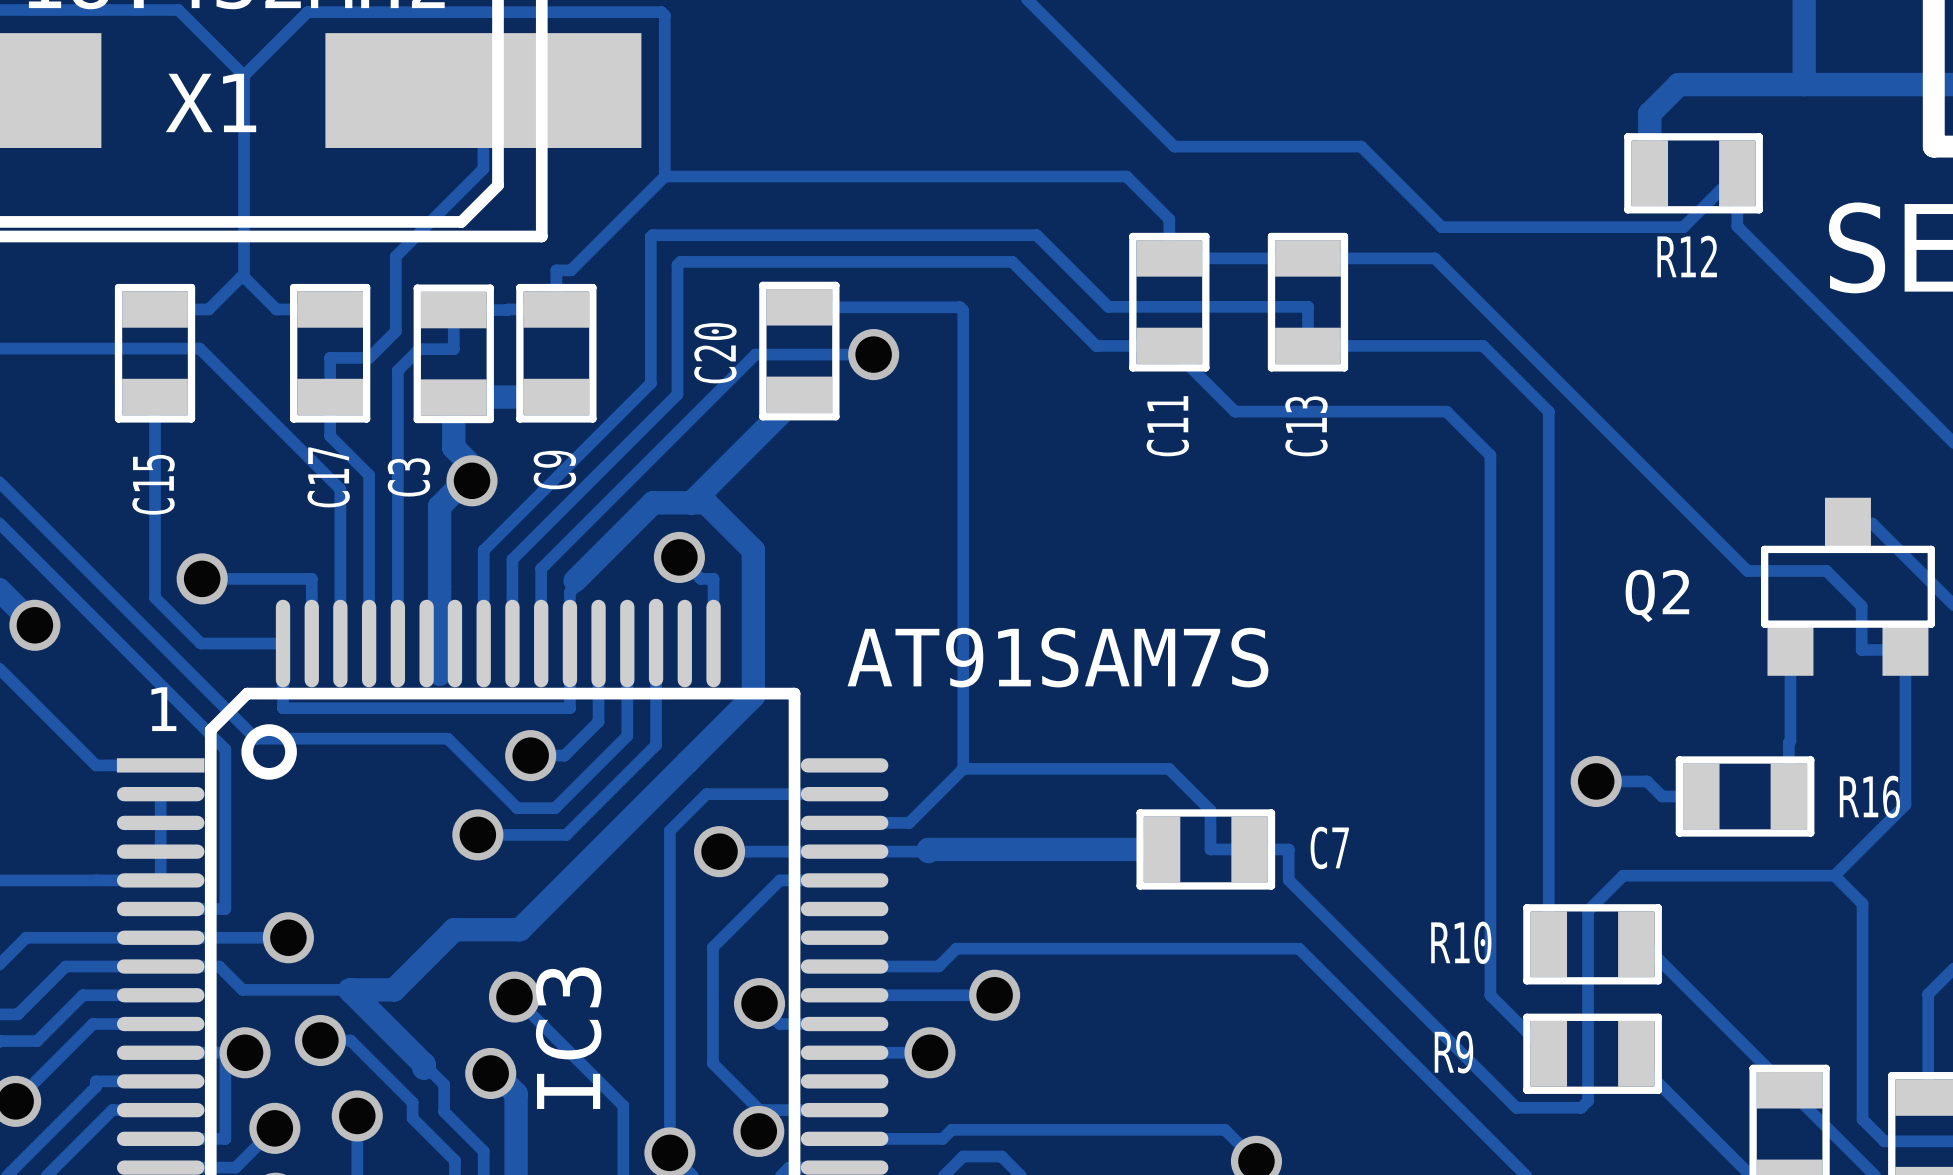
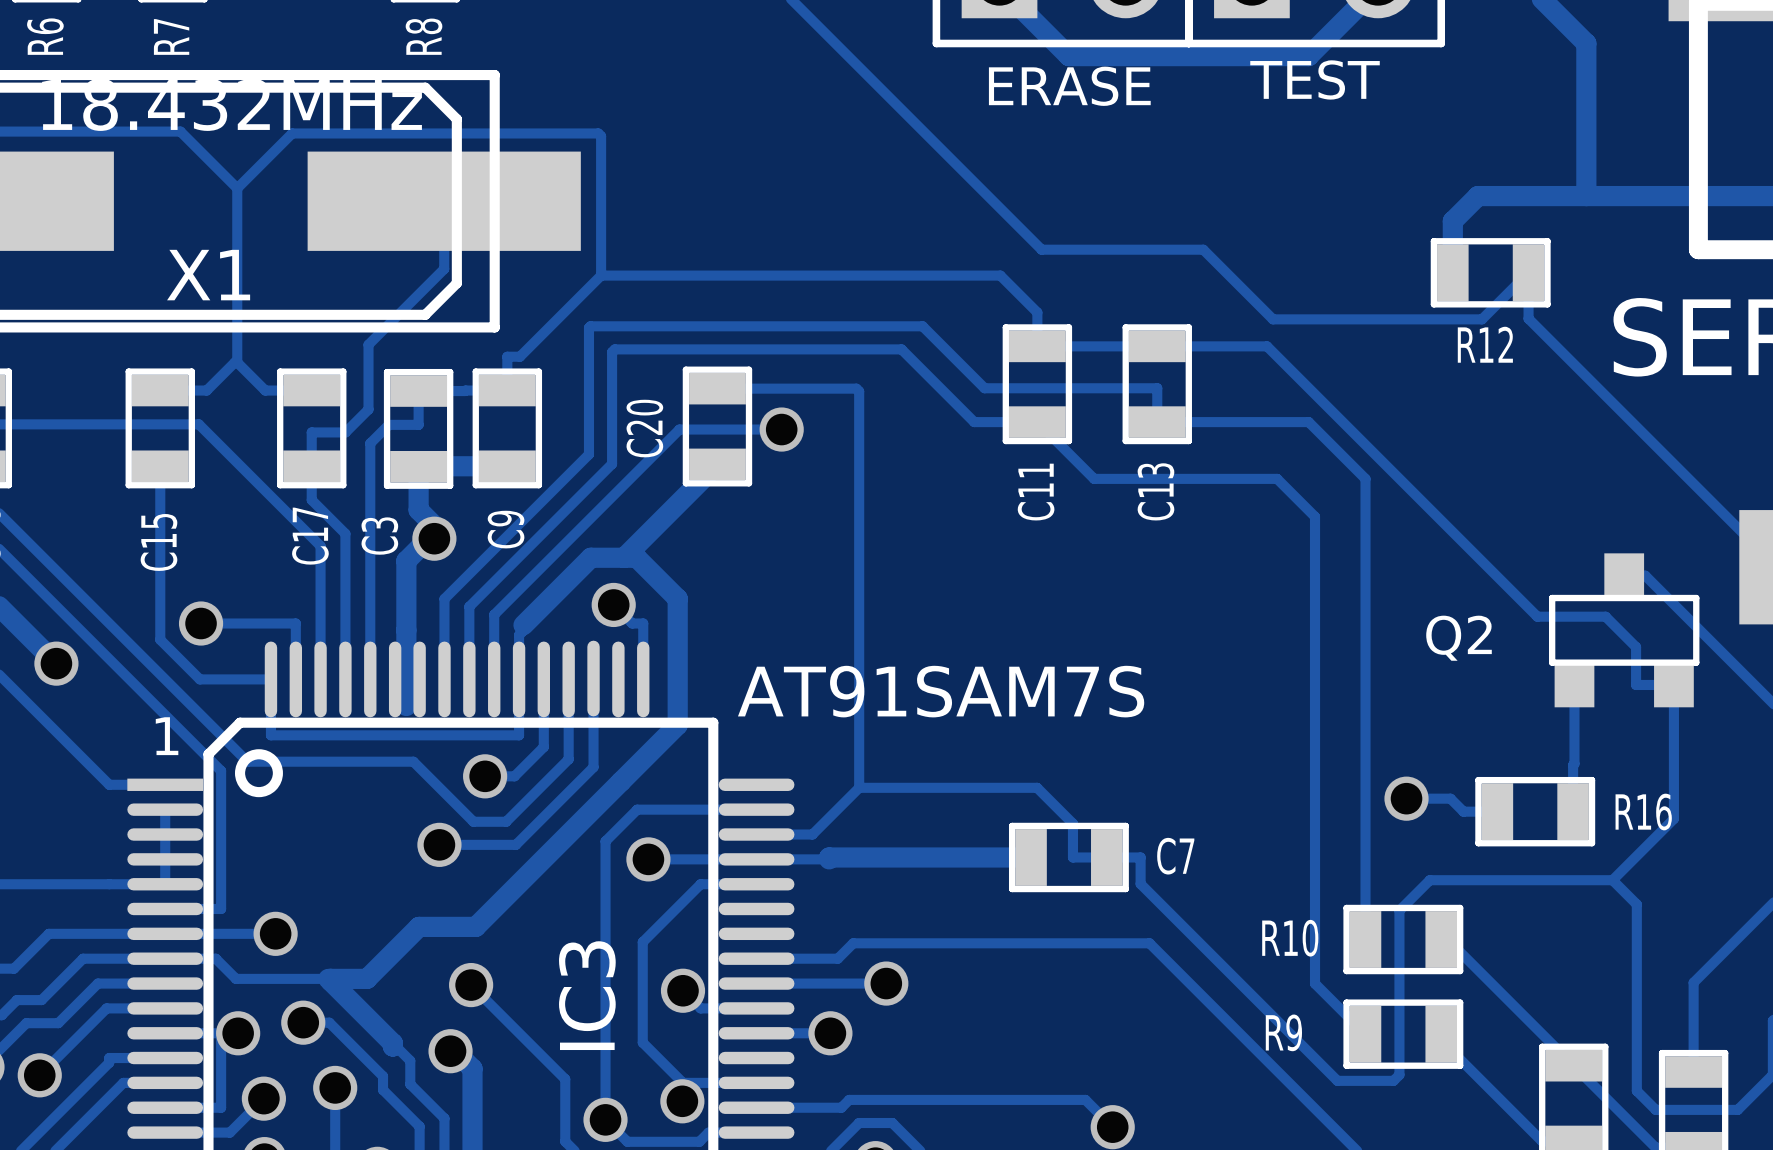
X1 name position: X1 (211, 102) -> X1 (208, 275)
IC3 name position: IC3 (568, 1038) -> IC3 (587, 995)

